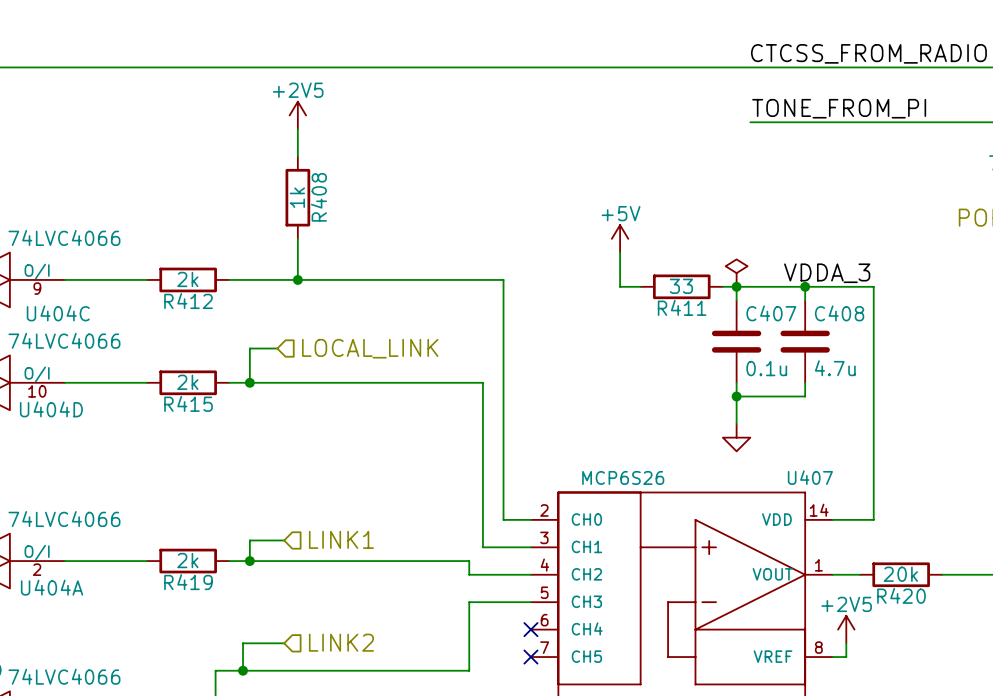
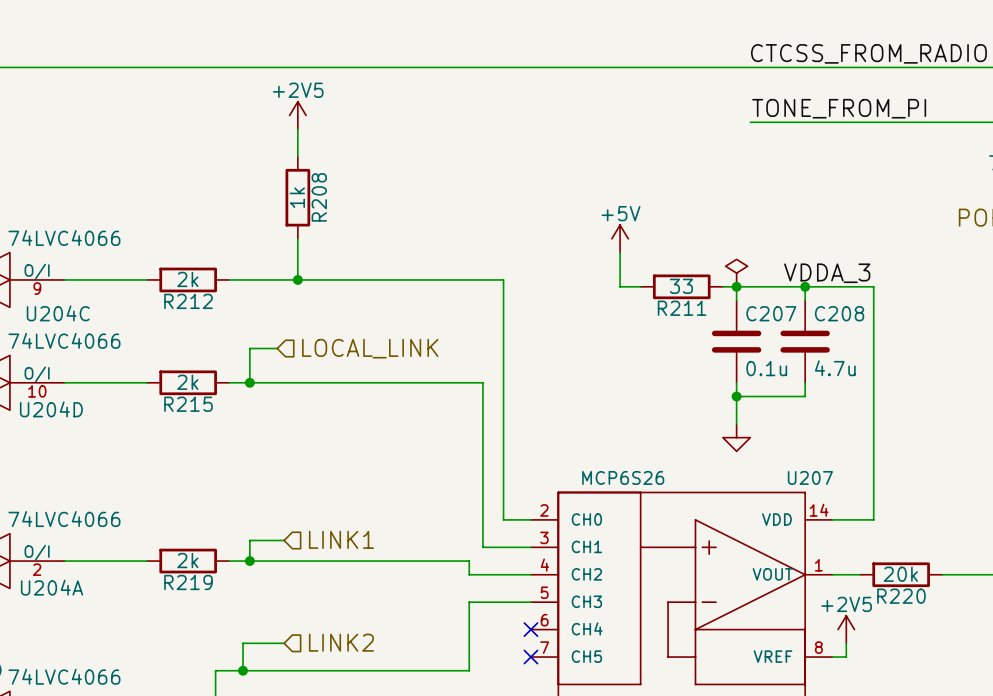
R408 name: R408 (318, 197) -> R208 (319, 197)
R412 name: R412 (188, 301) -> R212 (188, 301)
R411 name: R411 (682, 307) -> R211 (682, 308)
U404C name: U404C (58, 313) -> U204C (58, 313)
C407 name: C407 (771, 313) -> C207 (771, 313)
C408 name: C408 (839, 313) -> C208 (839, 313)
R415 name: R415 (188, 403) -> R215 (188, 404)
U404D name: U404D (51, 409) -> U204D (51, 409)
U407 name: U407 (810, 477) -> U207 (810, 477)
R419 name: R419 (188, 582) -> R219 (188, 582)
U404A name: U404A (52, 587) -> U204A (52, 587)
R420 name: R420 (901, 595) -> R220 (901, 596)

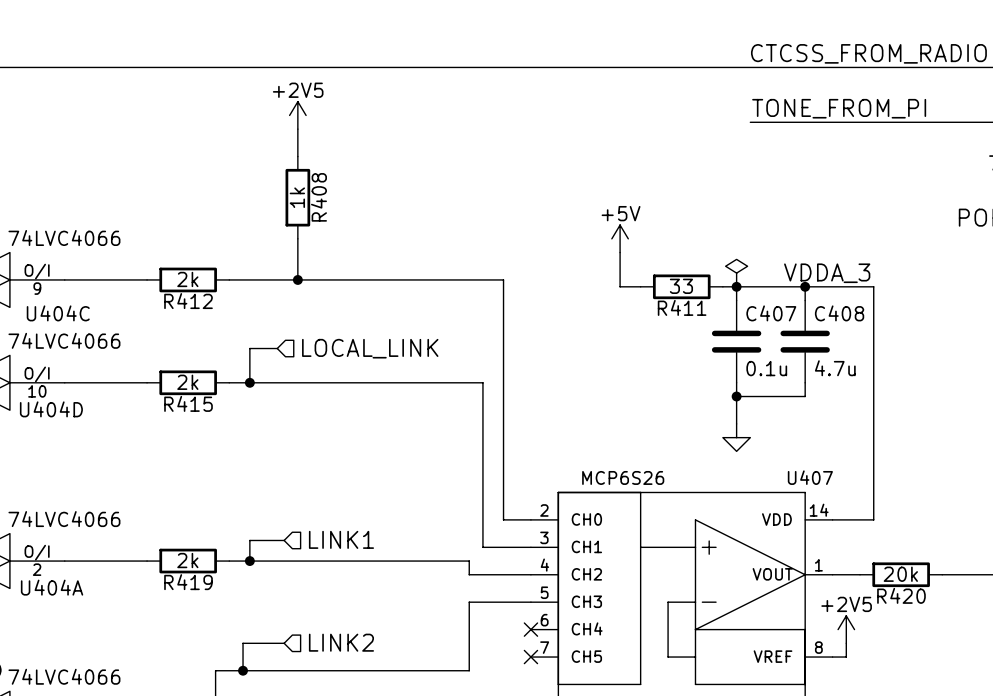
R208 name: R208 (319, 197) -> R408 (318, 197)
R212 name: R212 (188, 301) -> R412 (188, 301)
R211 name: R211 (682, 308) -> R411 (682, 307)
U204C name: U204C (58, 313) -> U404C (58, 313)
C207 name: C207 (771, 313) -> C407 (771, 313)
C208 name: C208 (839, 313) -> C408 (839, 313)
R215 name: R215 (188, 404) -> R415 (188, 403)
U204D name: U204D (51, 409) -> U404D (51, 409)
U207 name: U207 (810, 477) -> U407 (810, 477)
R219 name: R219 (188, 582) -> R419 (188, 582)
U204A name: U204A (52, 587) -> U404A (52, 587)
R220 name: R220 (901, 596) -> R420 (901, 595)

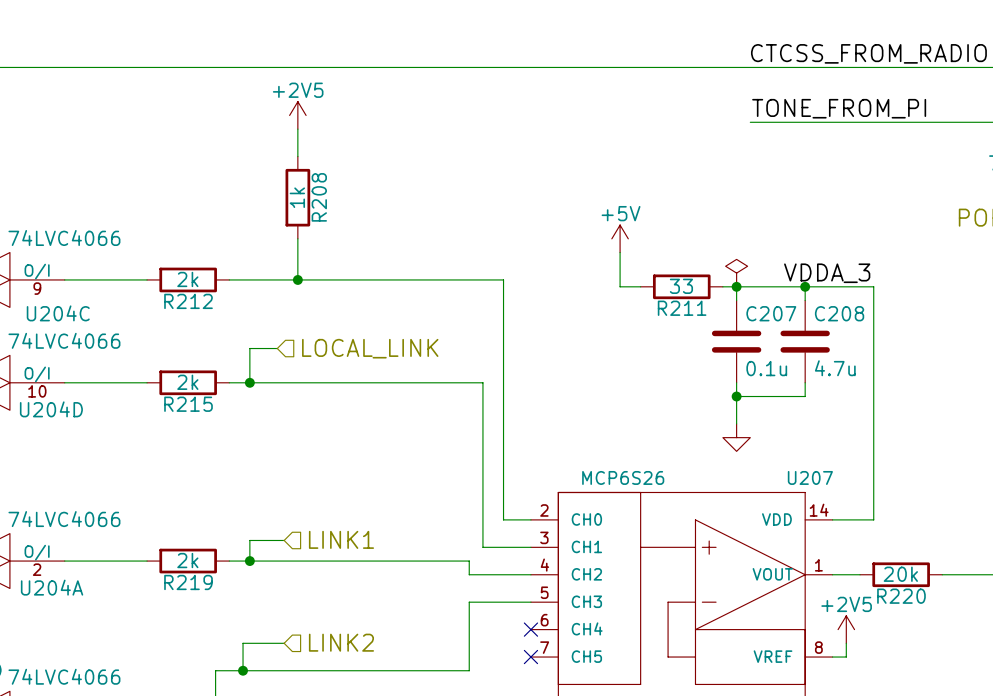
R408 name: R408 (318, 197) -> R208 (319, 197)
R412 name: R412 (188, 301) -> R212 (188, 301)
R411 name: R411 (682, 307) -> R211 (682, 308)
U404C name: U404C (58, 313) -> U204C (58, 313)
C407 name: C407 (771, 313) -> C207 (771, 313)
C408 name: C408 (839, 313) -> C208 (839, 313)
R415 name: R415 (188, 403) -> R215 (188, 404)
U404D name: U404D (51, 409) -> U204D (51, 409)
U407 name: U407 (810, 477) -> U207 (810, 477)
R419 name: R419 (188, 582) -> R219 (188, 582)
U404A name: U404A (52, 587) -> U204A (52, 587)
R420 name: R420 (901, 595) -> R220 (901, 596)

